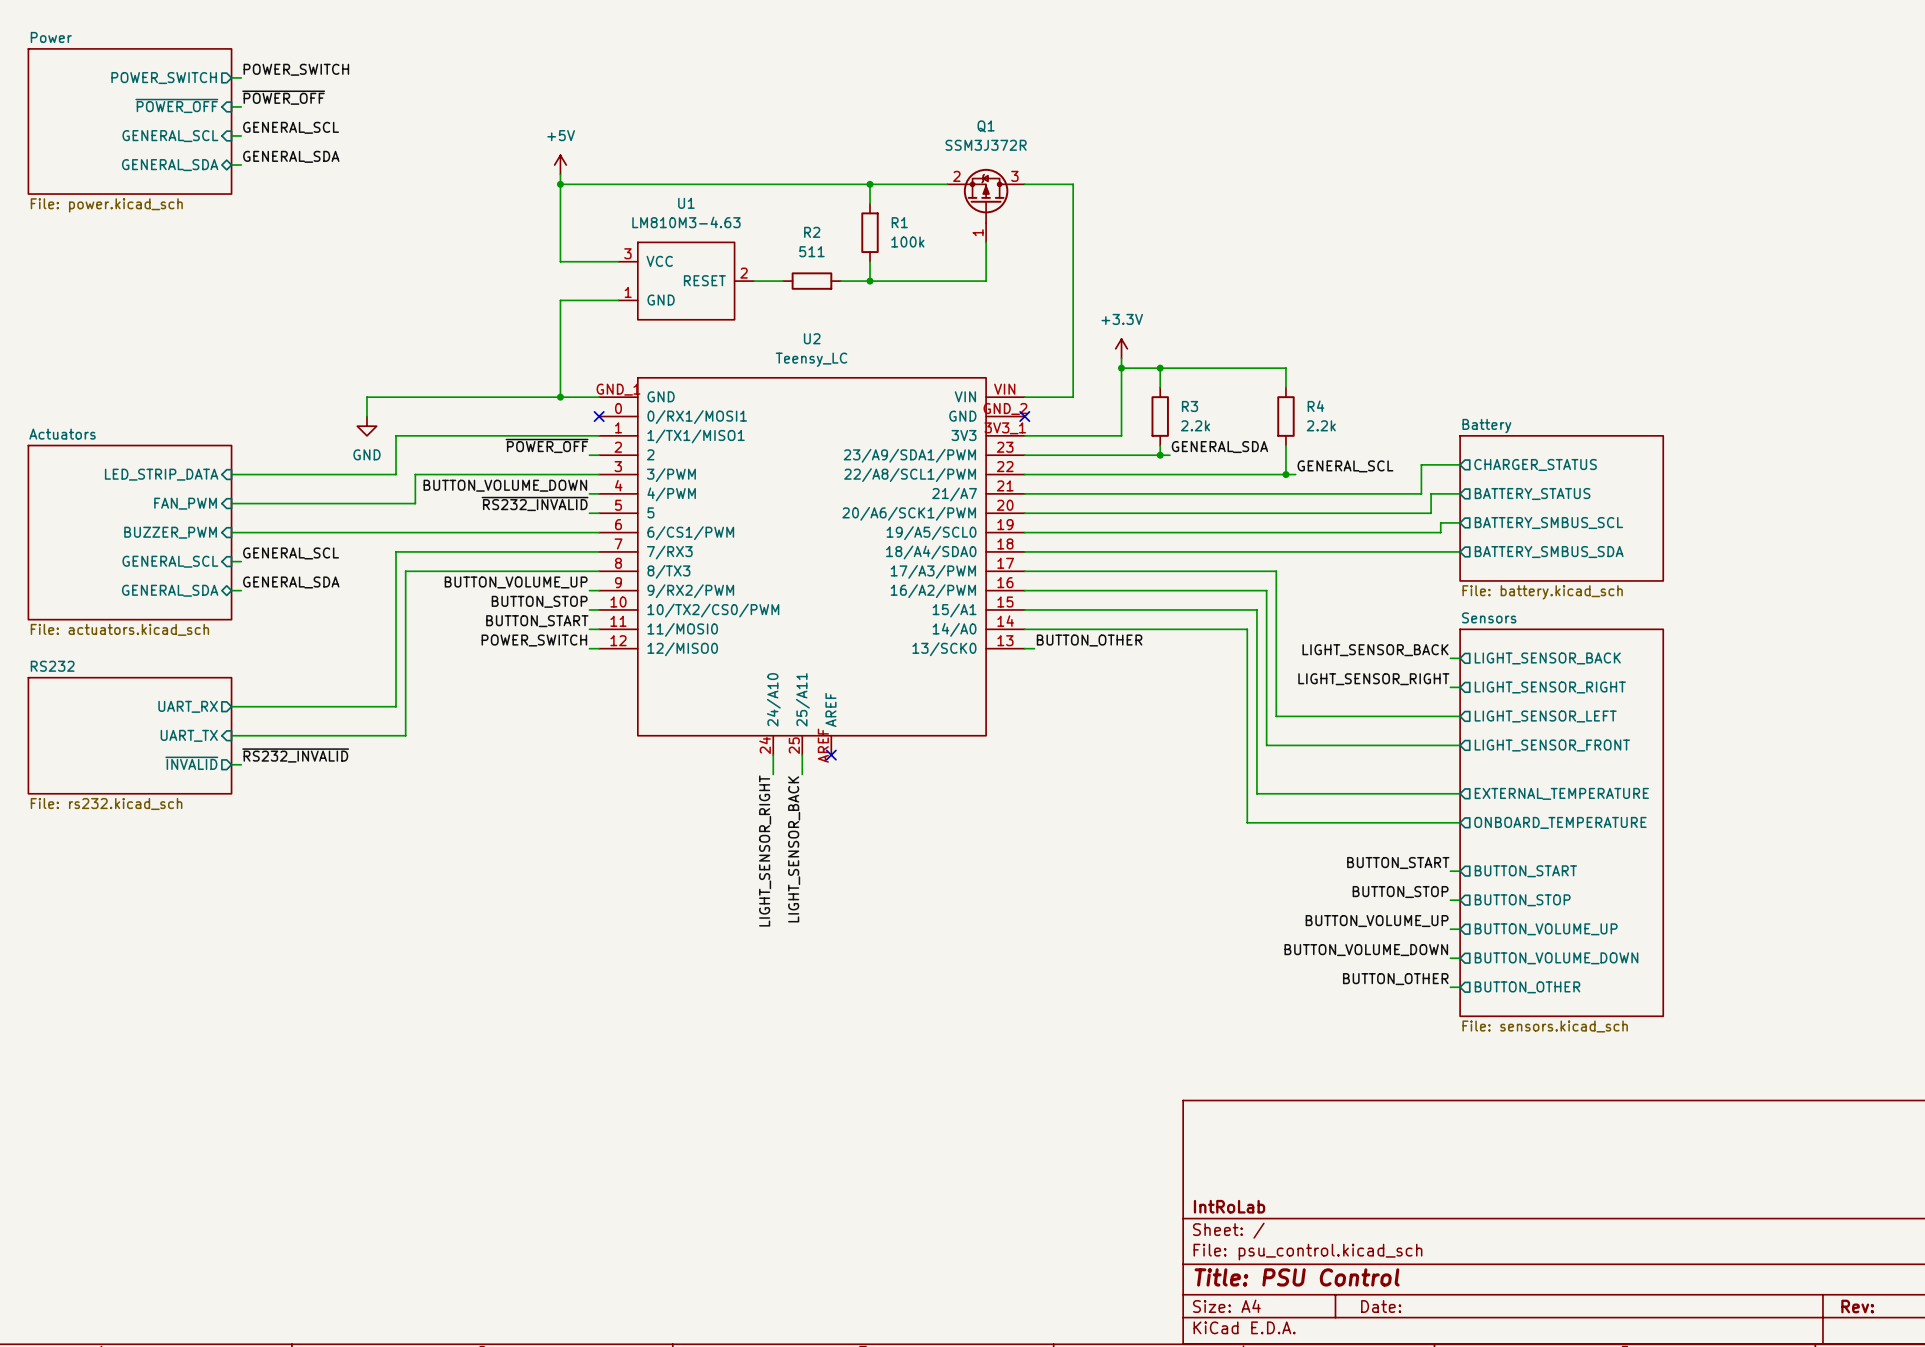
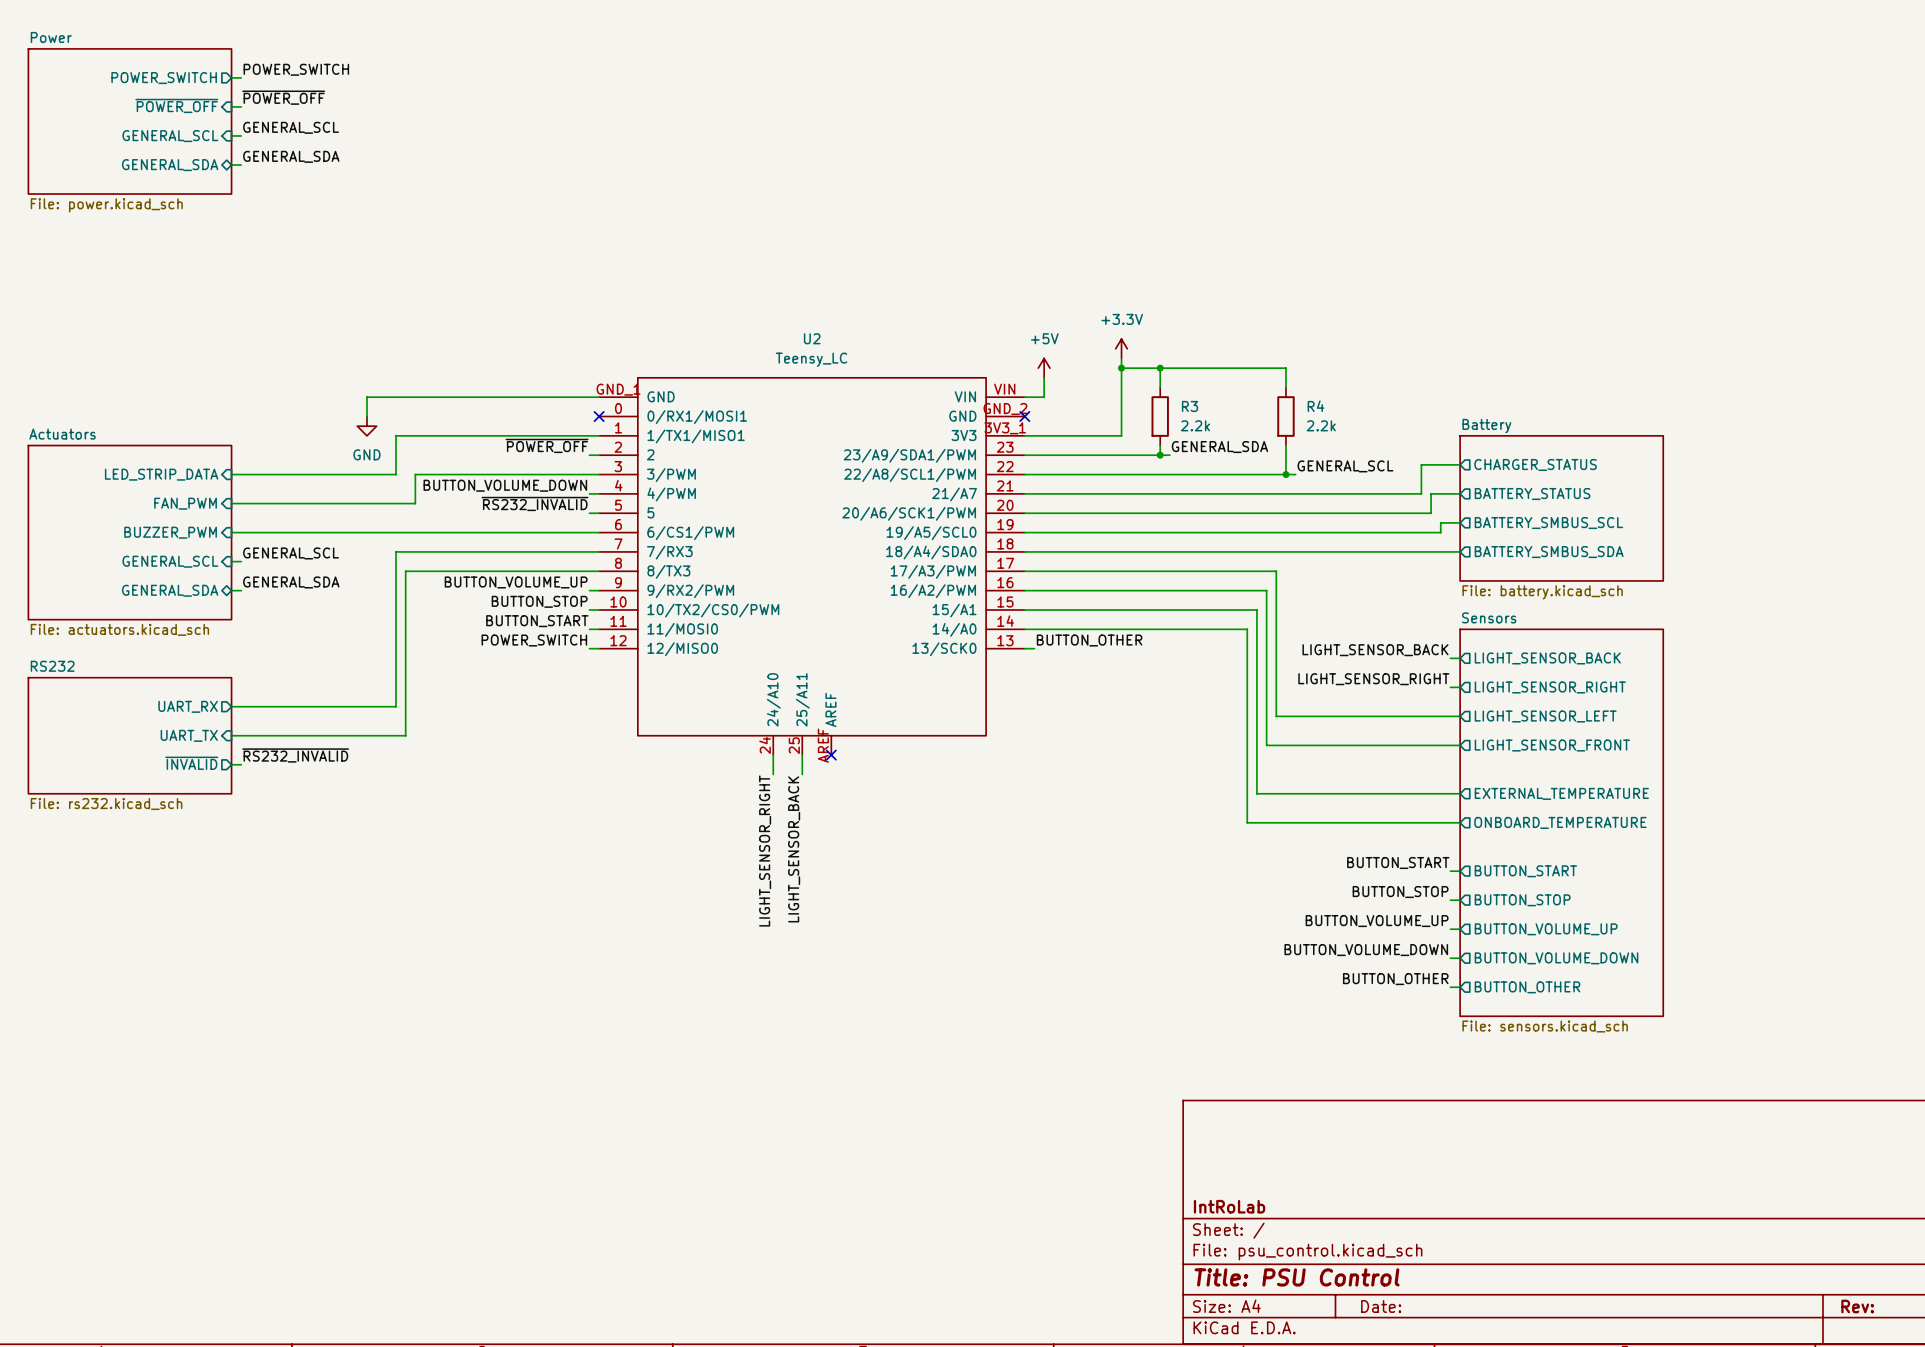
power symbol: +5V (560, 165) -> none
wire: (560, 174) (560, 261) (618, 261) -> none
wire: (560, 184) (947, 184) -> none
junction: (560, 184) -> none
wire: (870, 184) (870, 203) -> none
junction: (870, 184) -> none
wire: (1024, 184) (1073, 184) (1073, 397) (1044, 397) -> (1044, 377) (1044, 397)
Q1: SSM3J372R (986, 205) -> none
R1: 100k (870, 232) -> none
wire: (986, 242) (986, 281) (840, 281) -> none
wire: (870, 261) (870, 281) -> none
U1: LM810M3-4.63 (686, 281) -> none
wire: (753, 281) (782, 281) -> none
R2: 511 (811, 281) -> none
junction: (870, 281) -> none
wire: (618, 300) (560, 300) (560, 397) -> none
power symbol: none -> +5V (1044, 368)
junction: (560, 397) -> none

